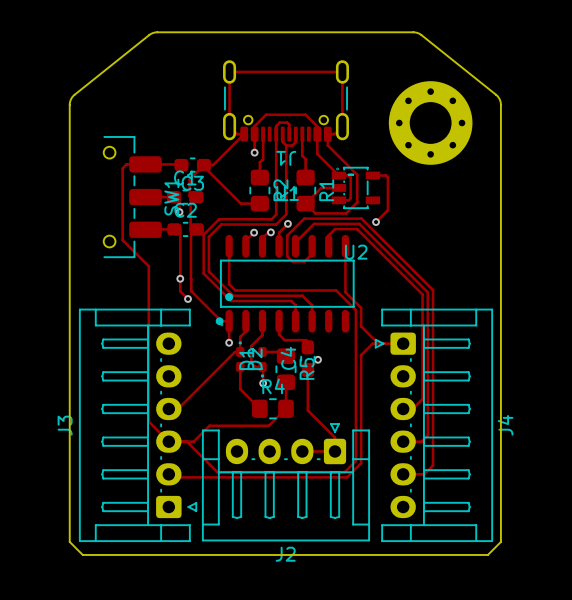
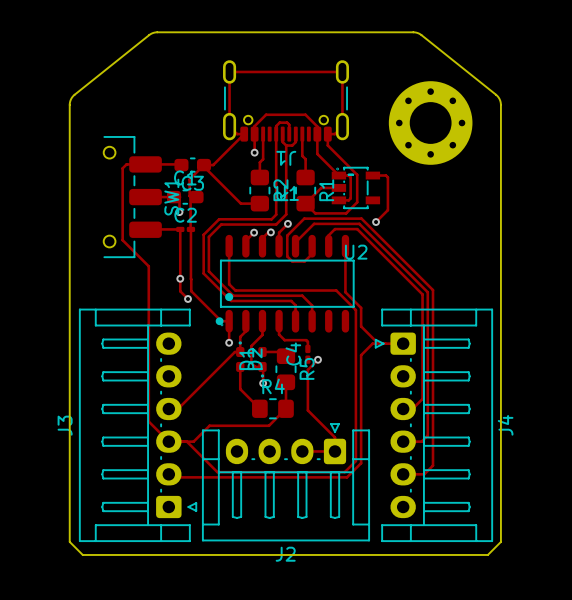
C2 footprint: [167, 221, 204, 237] -> [176, 226, 196, 233]
C4 footprint: [300, 340, 316, 377] -> [305, 344, 311, 364]

